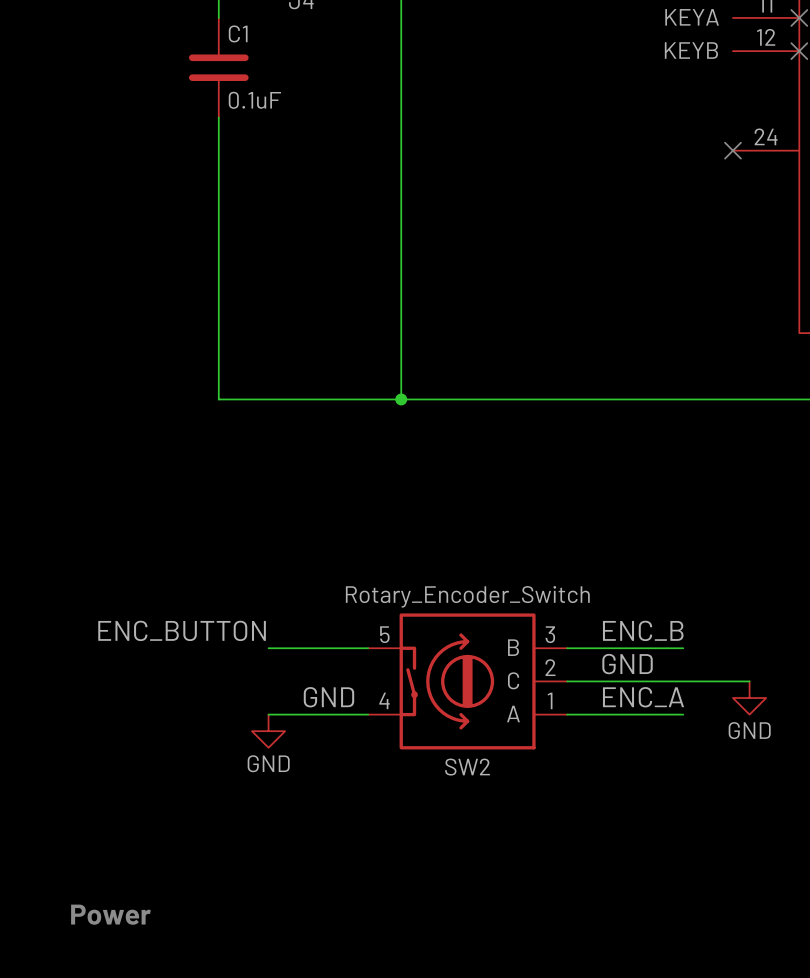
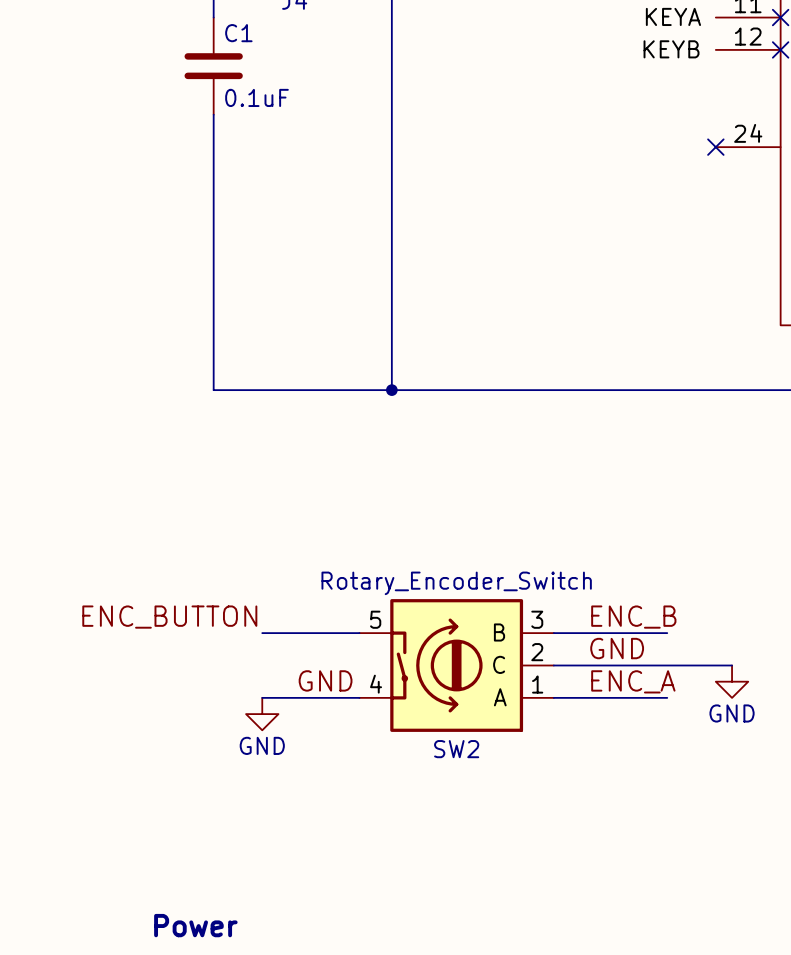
text position: Power (110, 914) -> Power (195, 925)

